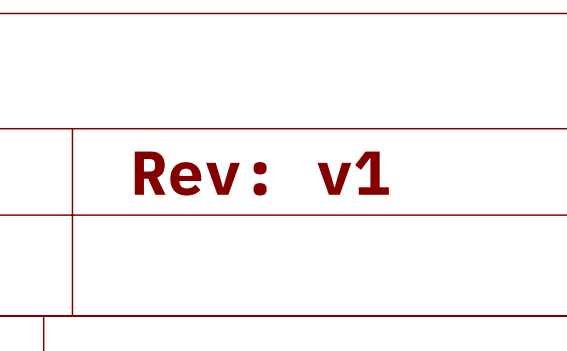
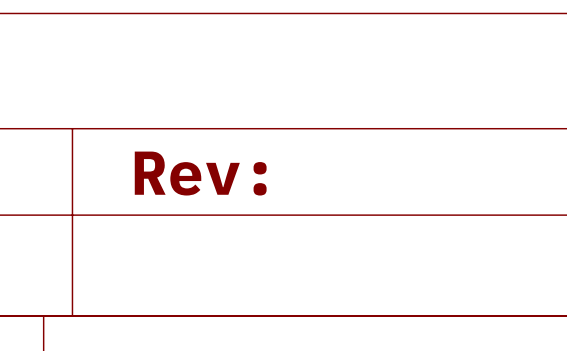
title block: Rev: v1 (261, 173) -> Rev: (200, 173)

